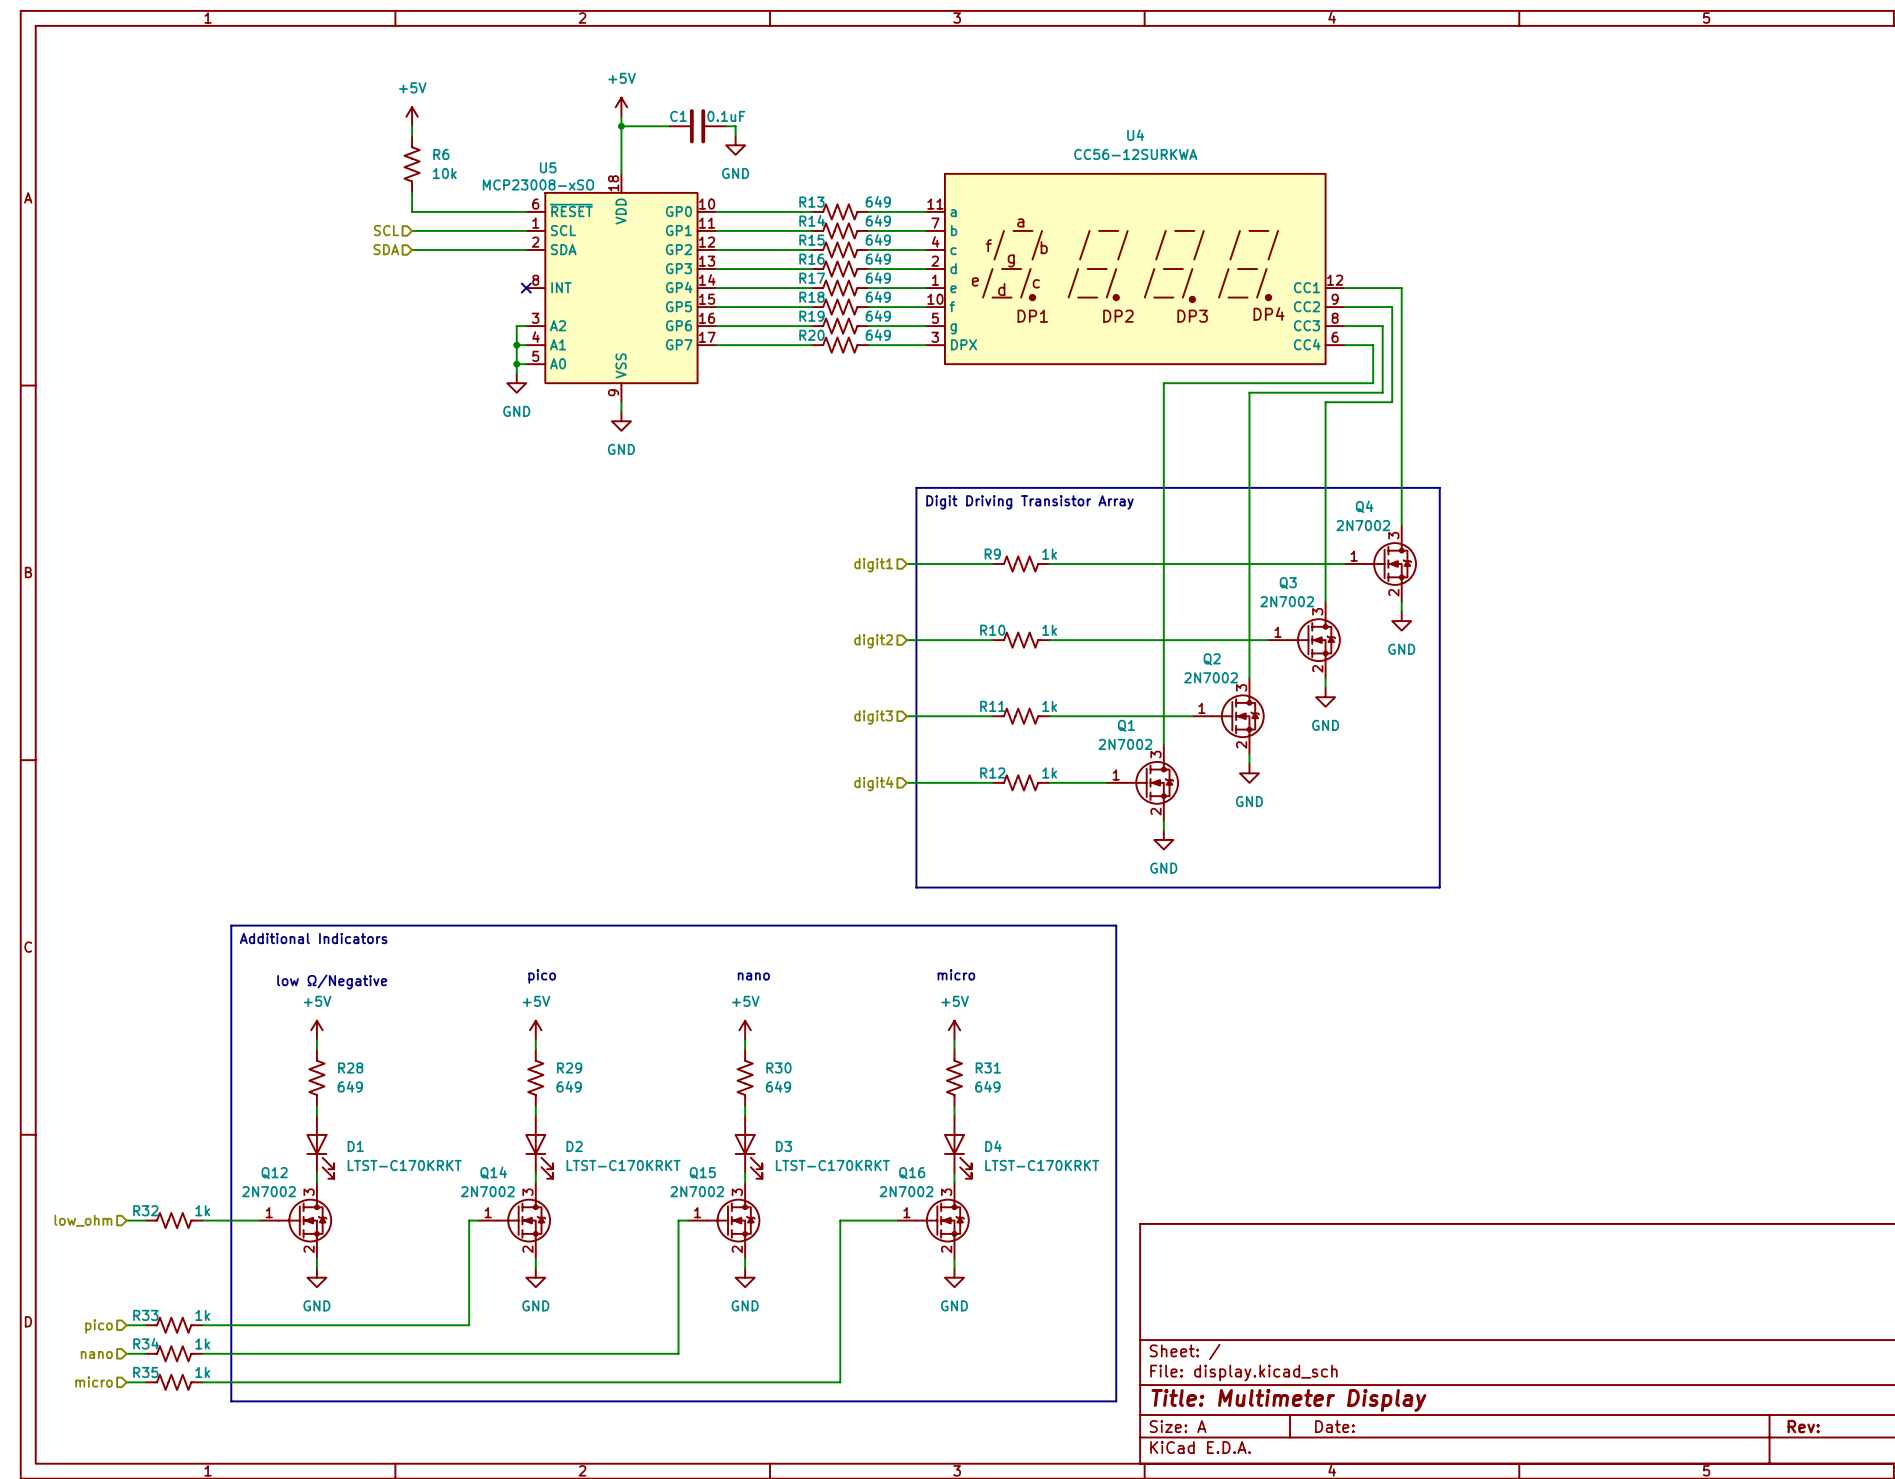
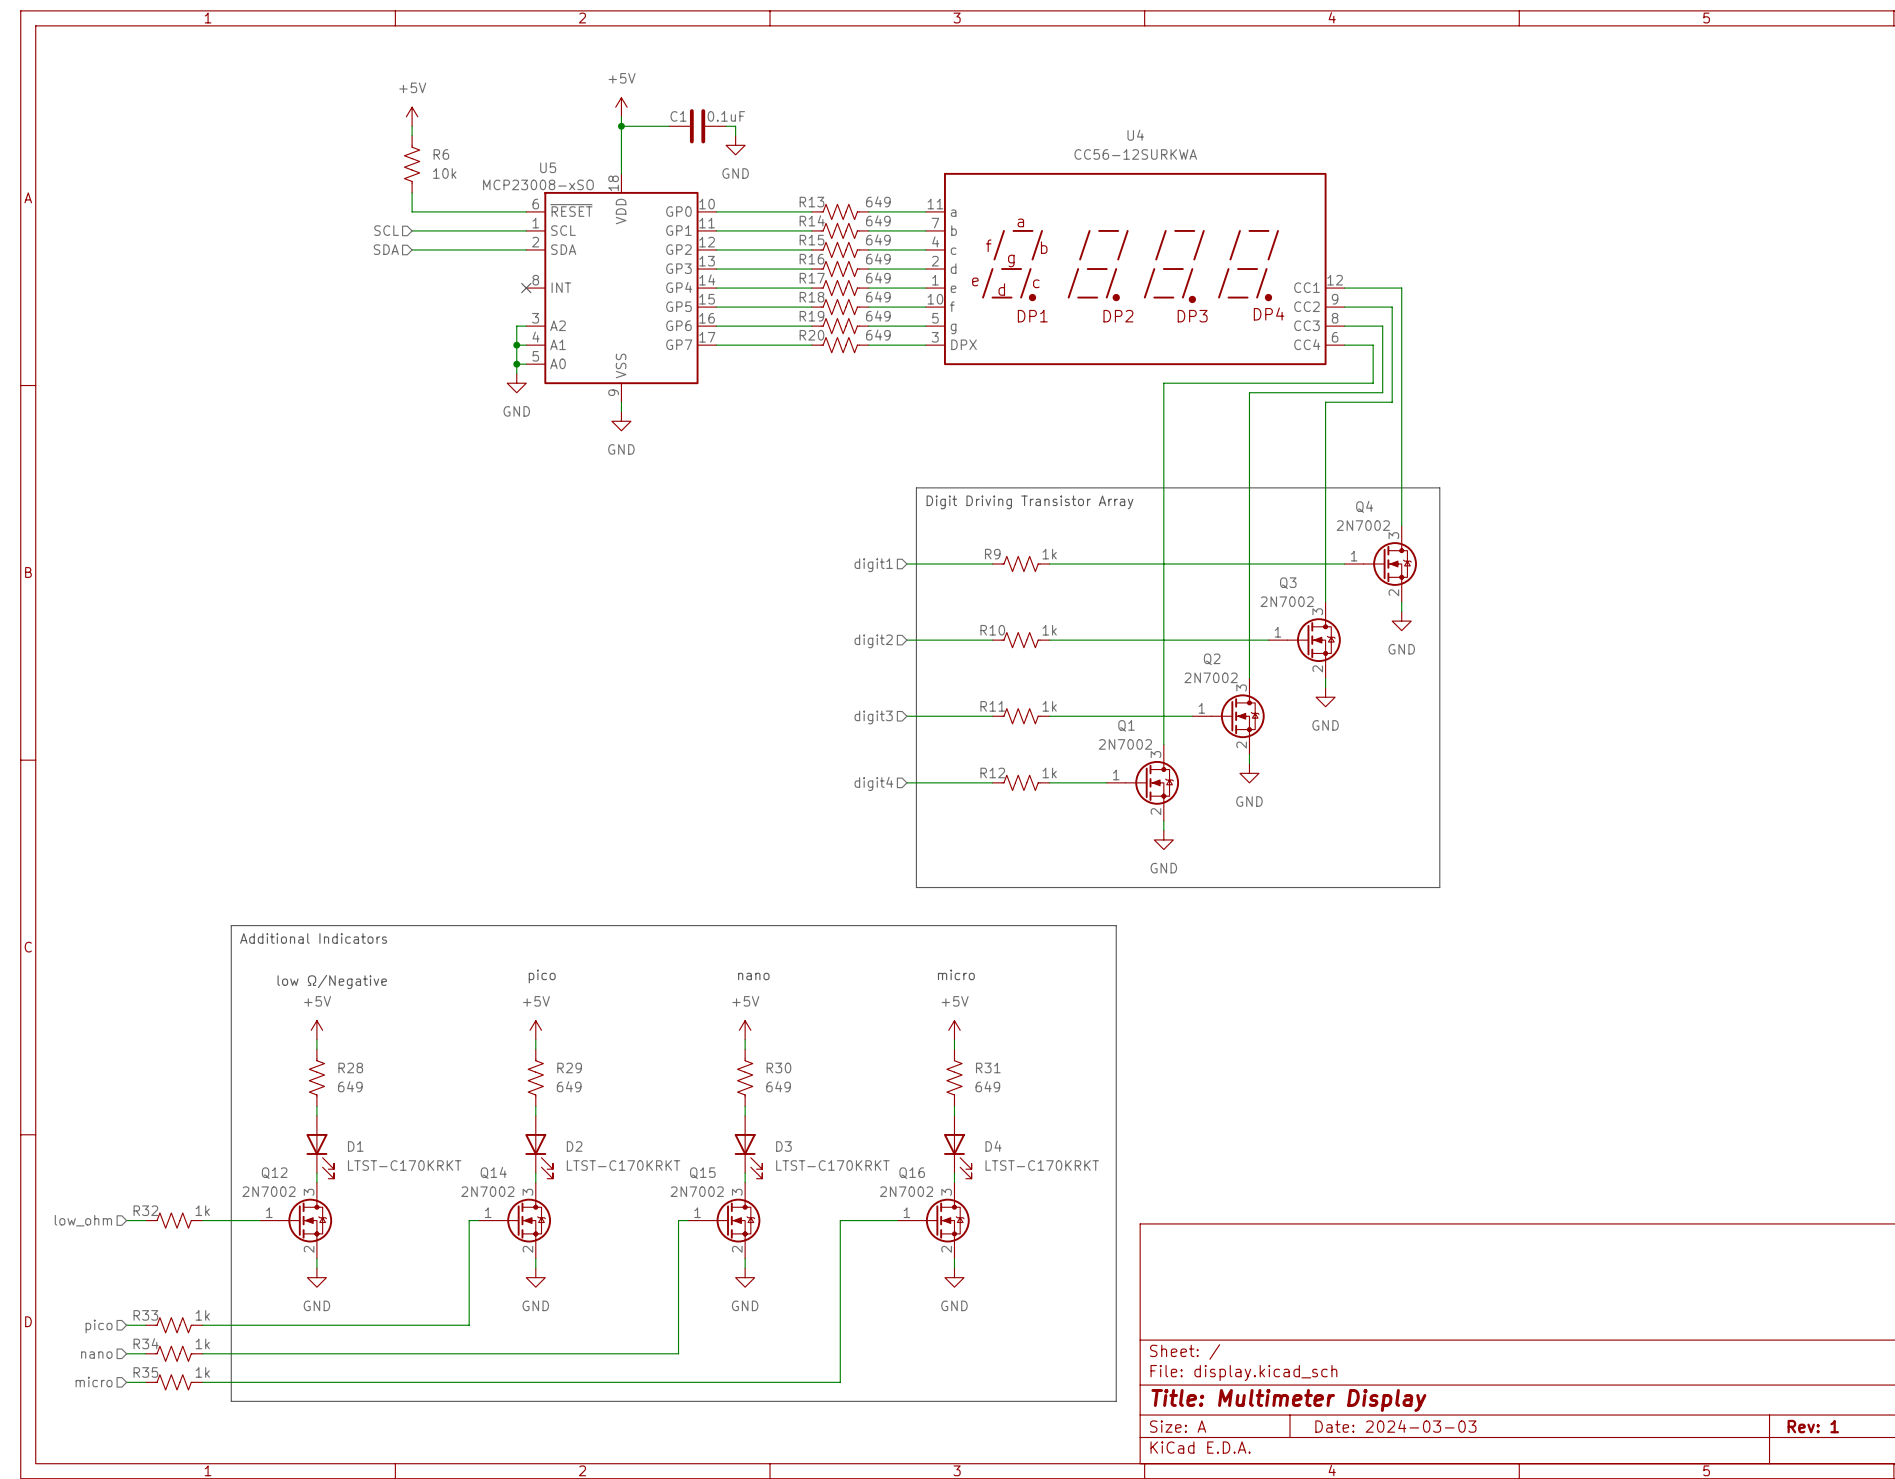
title block: Date: (1334, 1426) -> Date: 2024-03-03 (1395, 1426)
title block: Rev: (1803, 1426) -> Rev: 1 (1813, 1426)

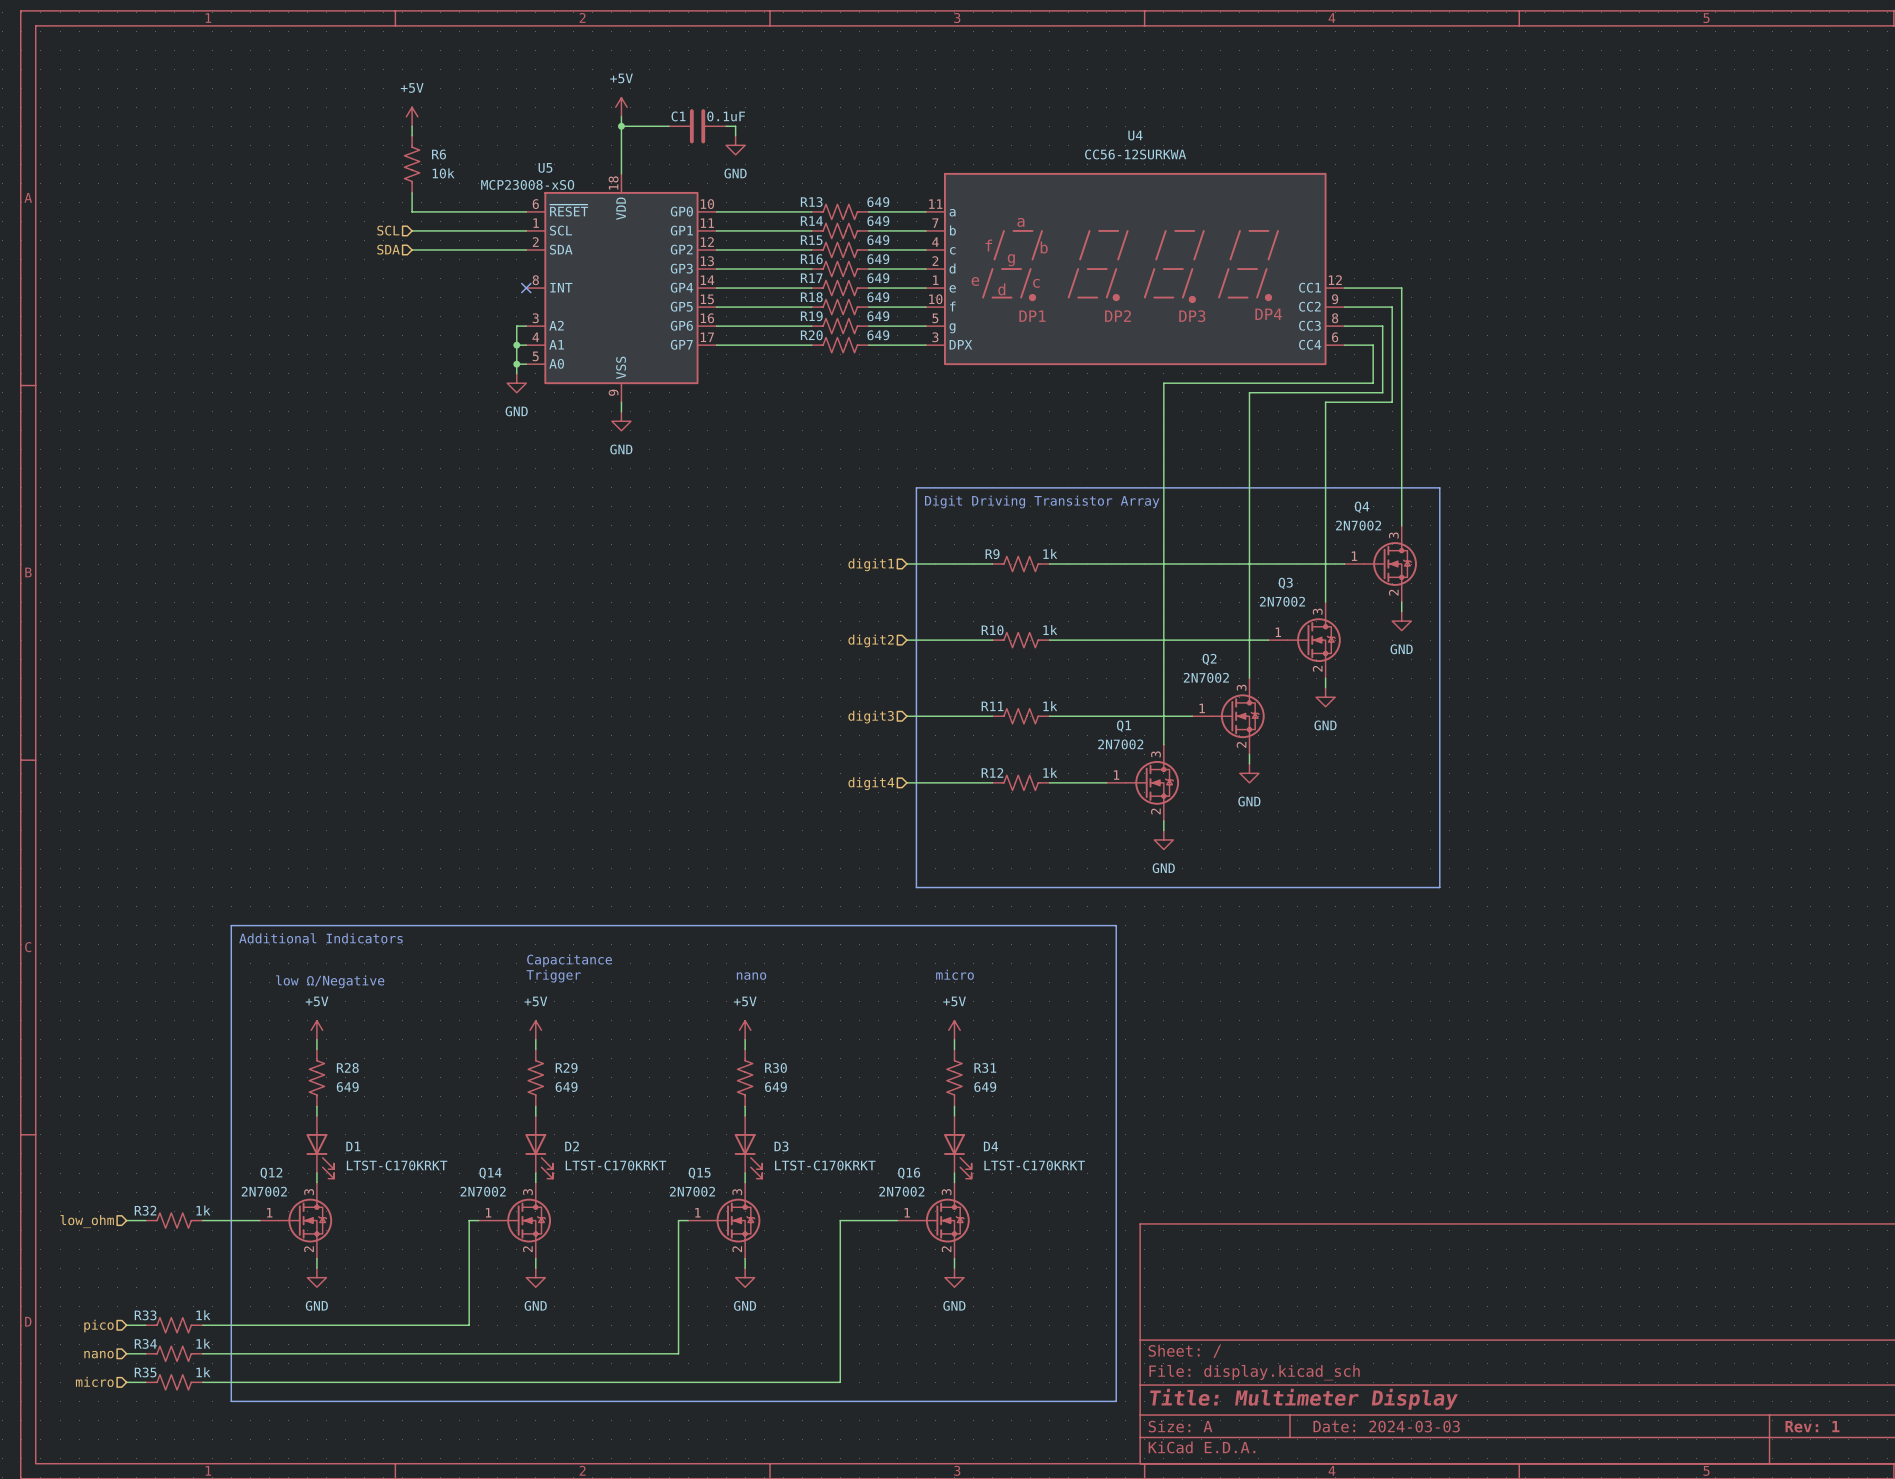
text: none -> Capacitance (569, 960)
text: pico (542, 976) -> Trigger (553, 976)

